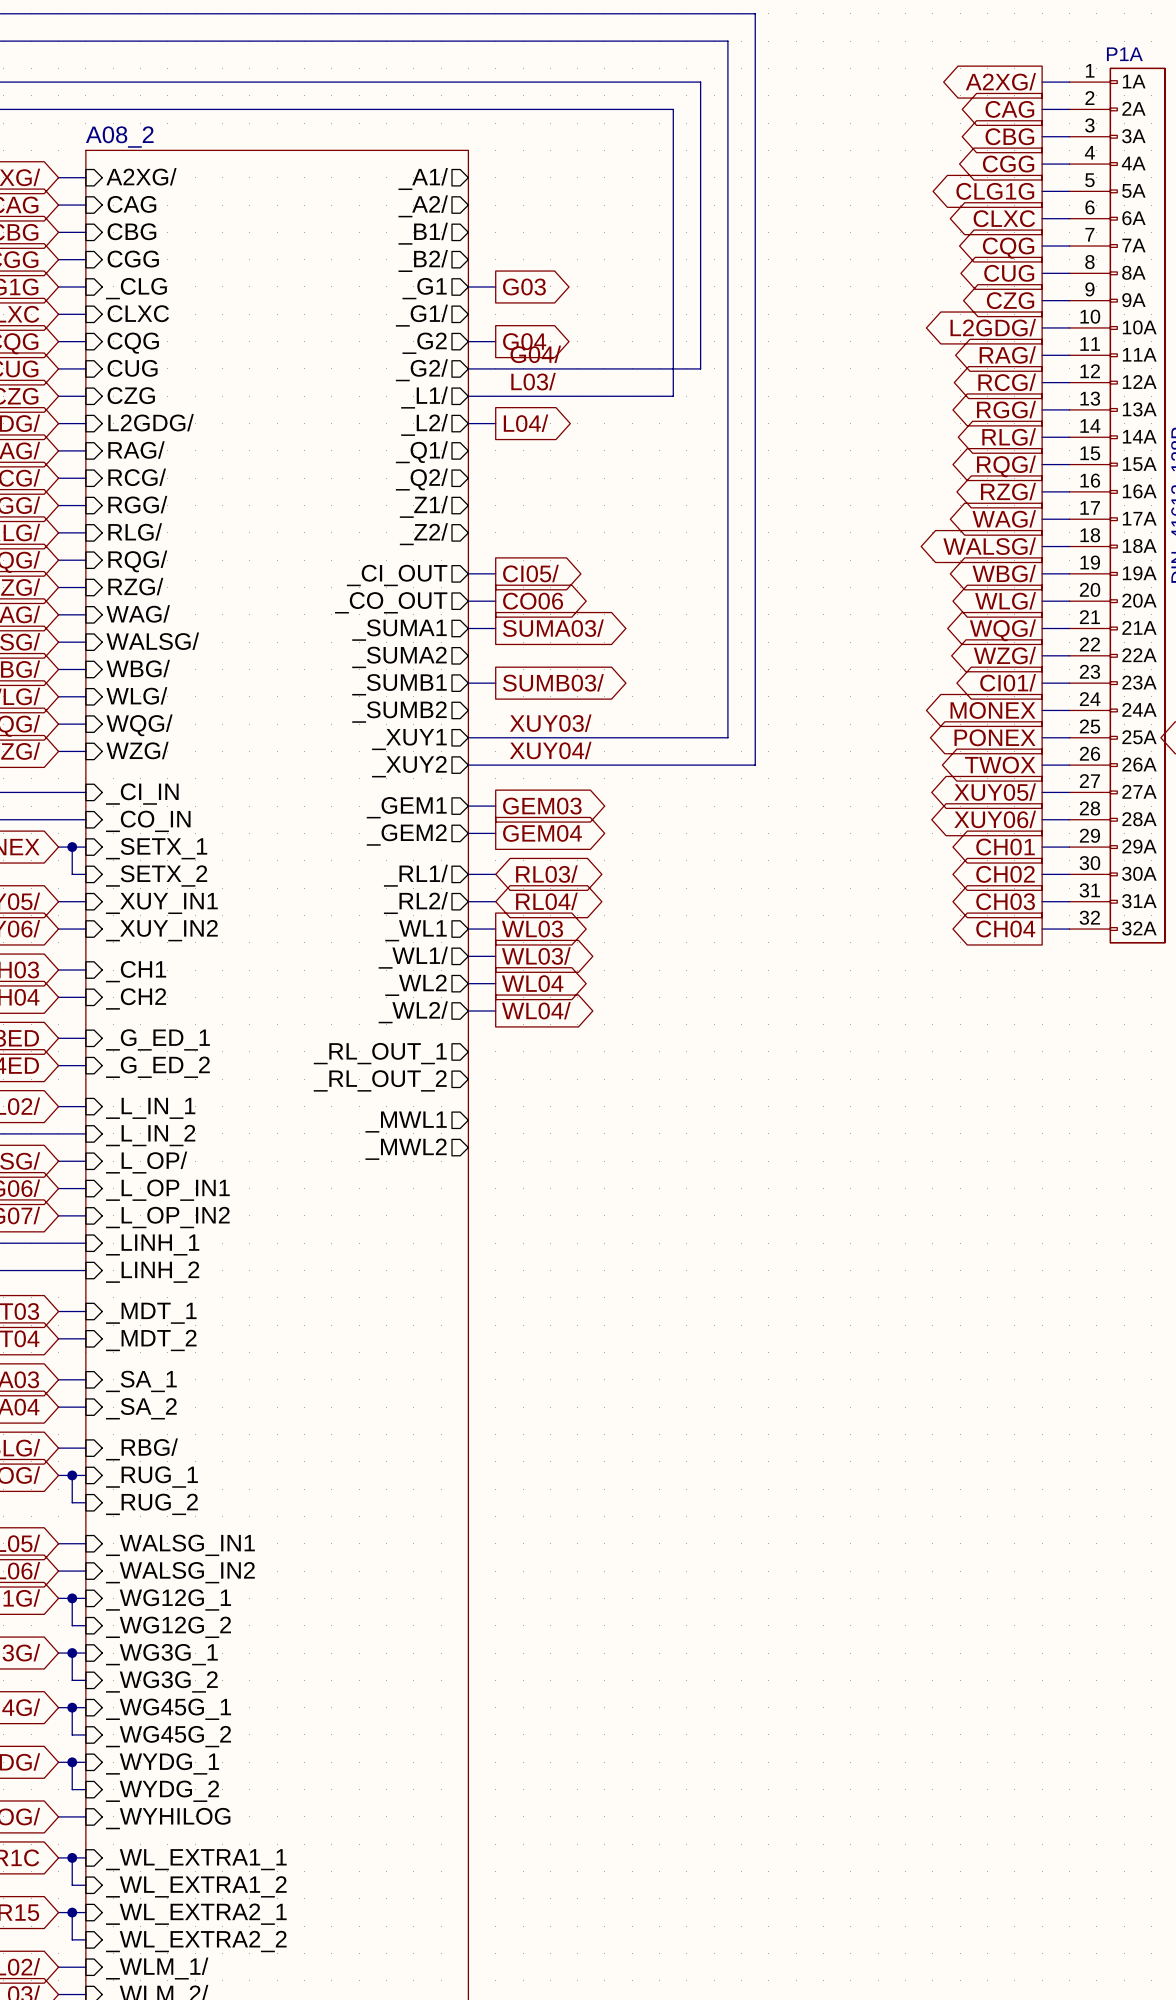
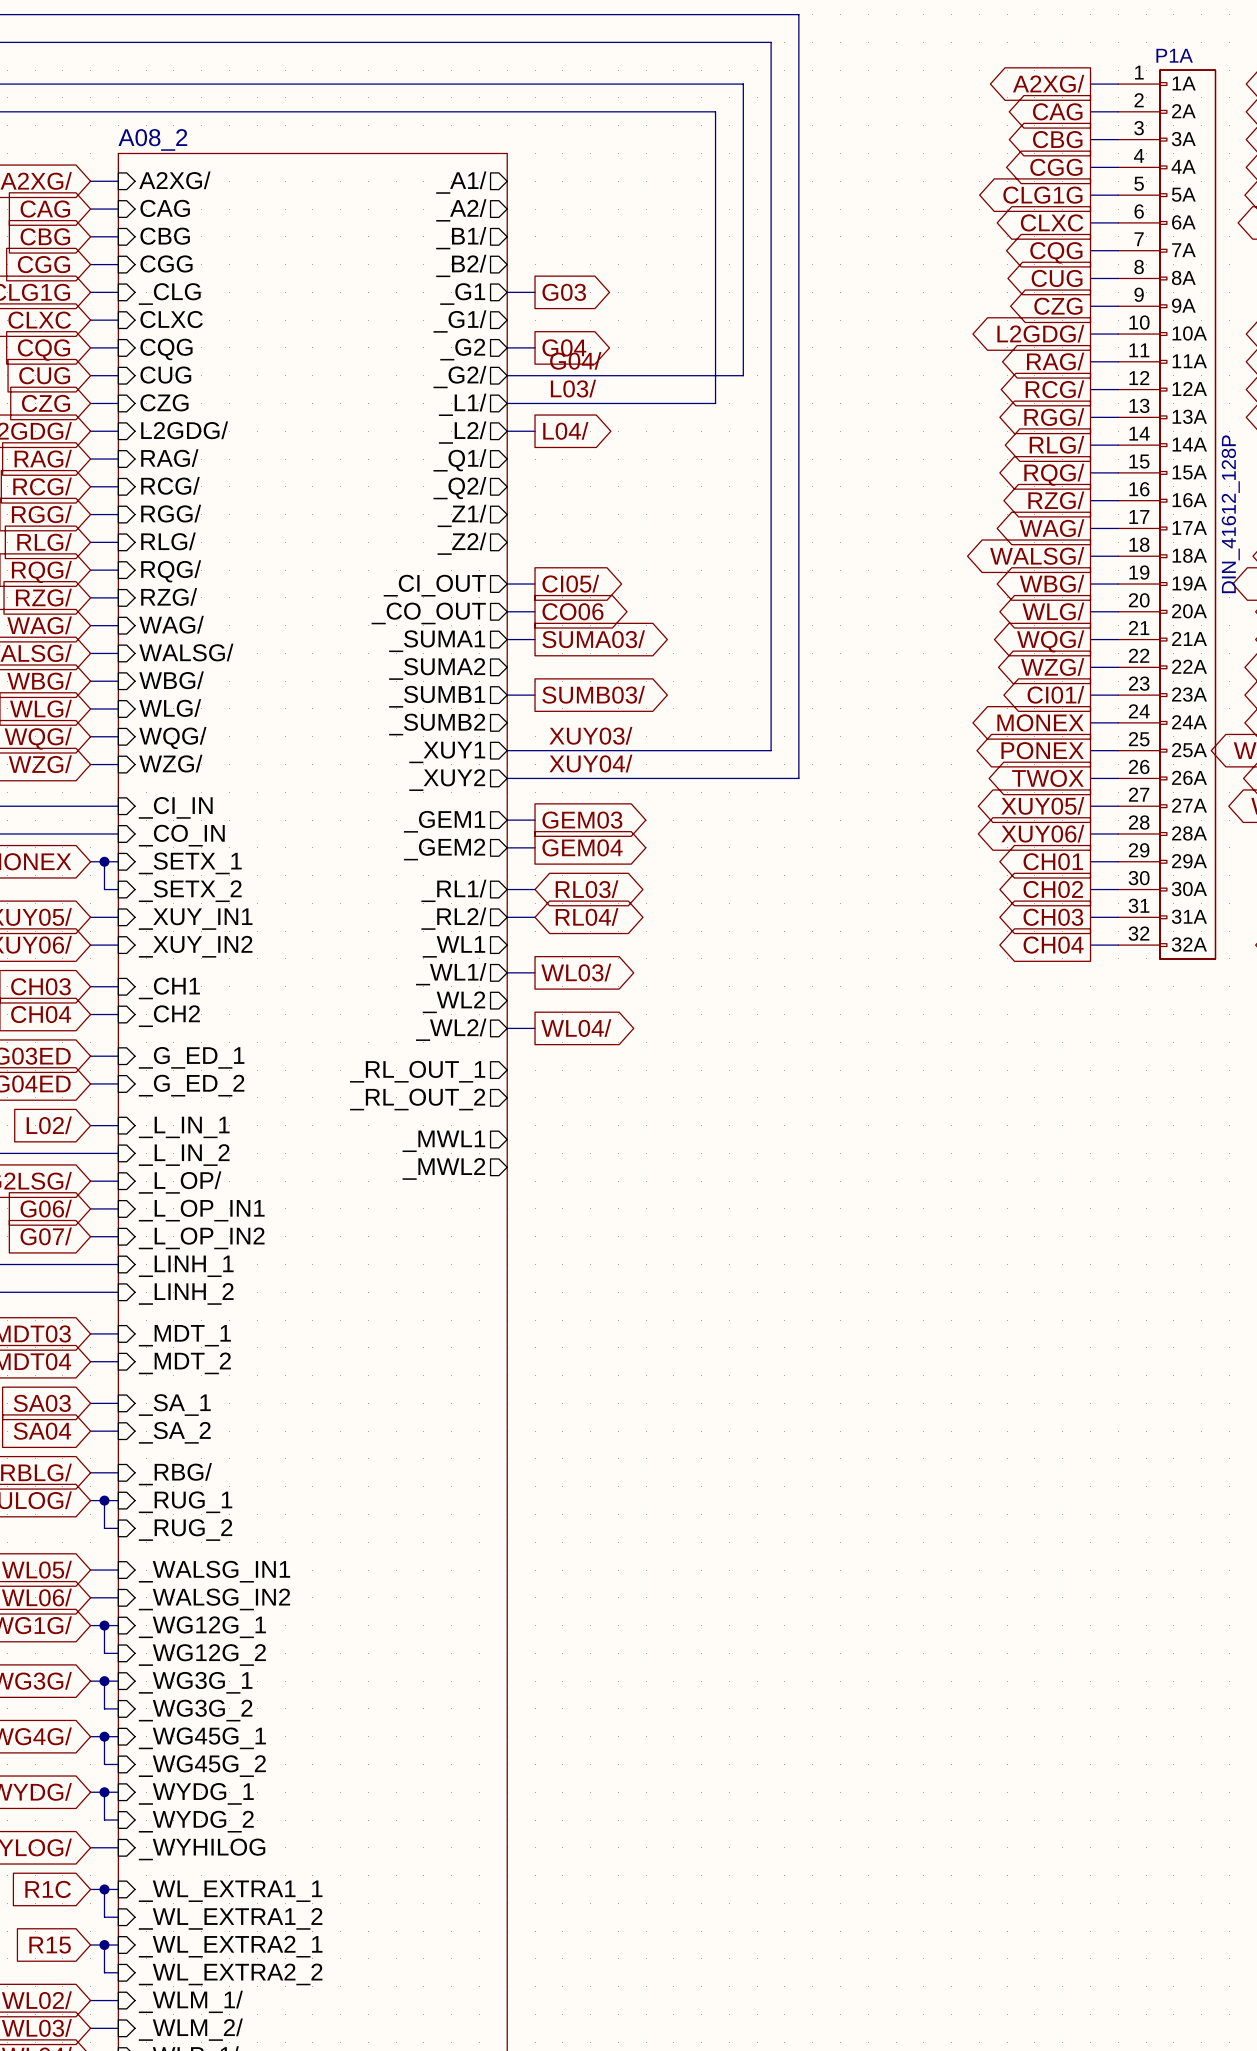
wire: (468, 929) (495, 929) -> none
global label: WL03 (532, 929) -> none
wire: (468, 983) (495, 983) -> none
global label: WL04 (532, 983) -> none

